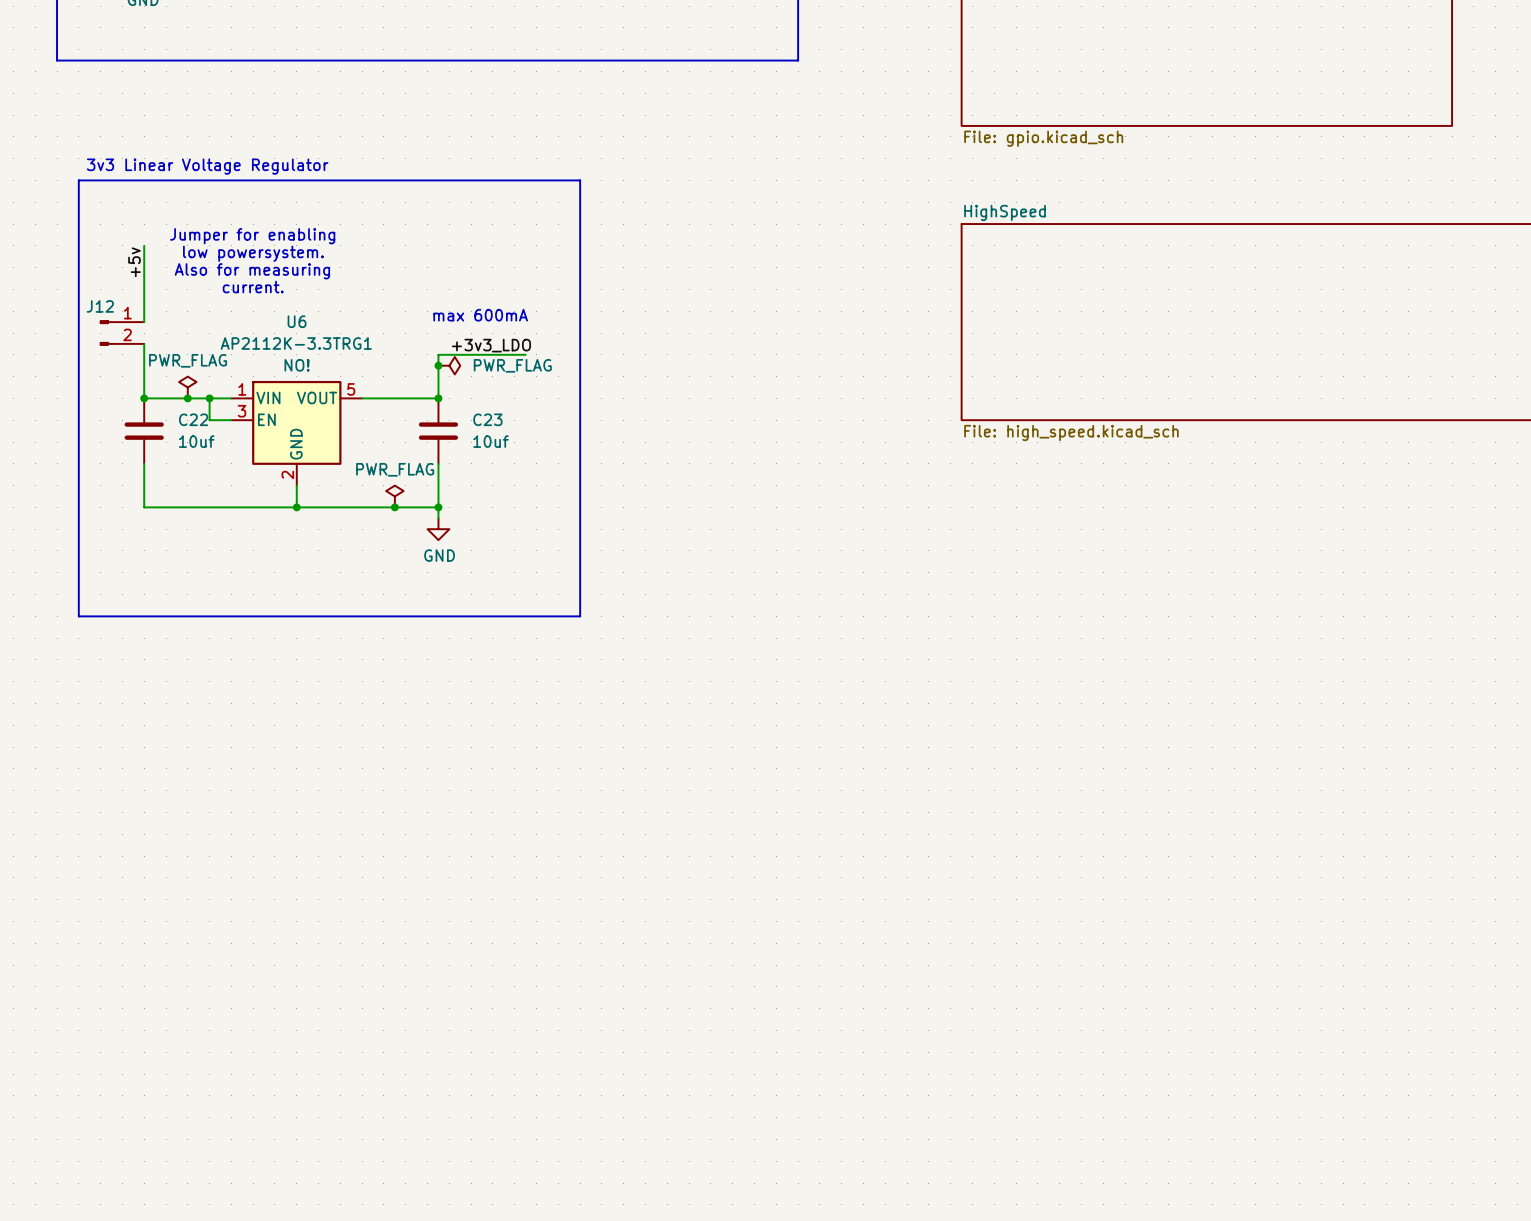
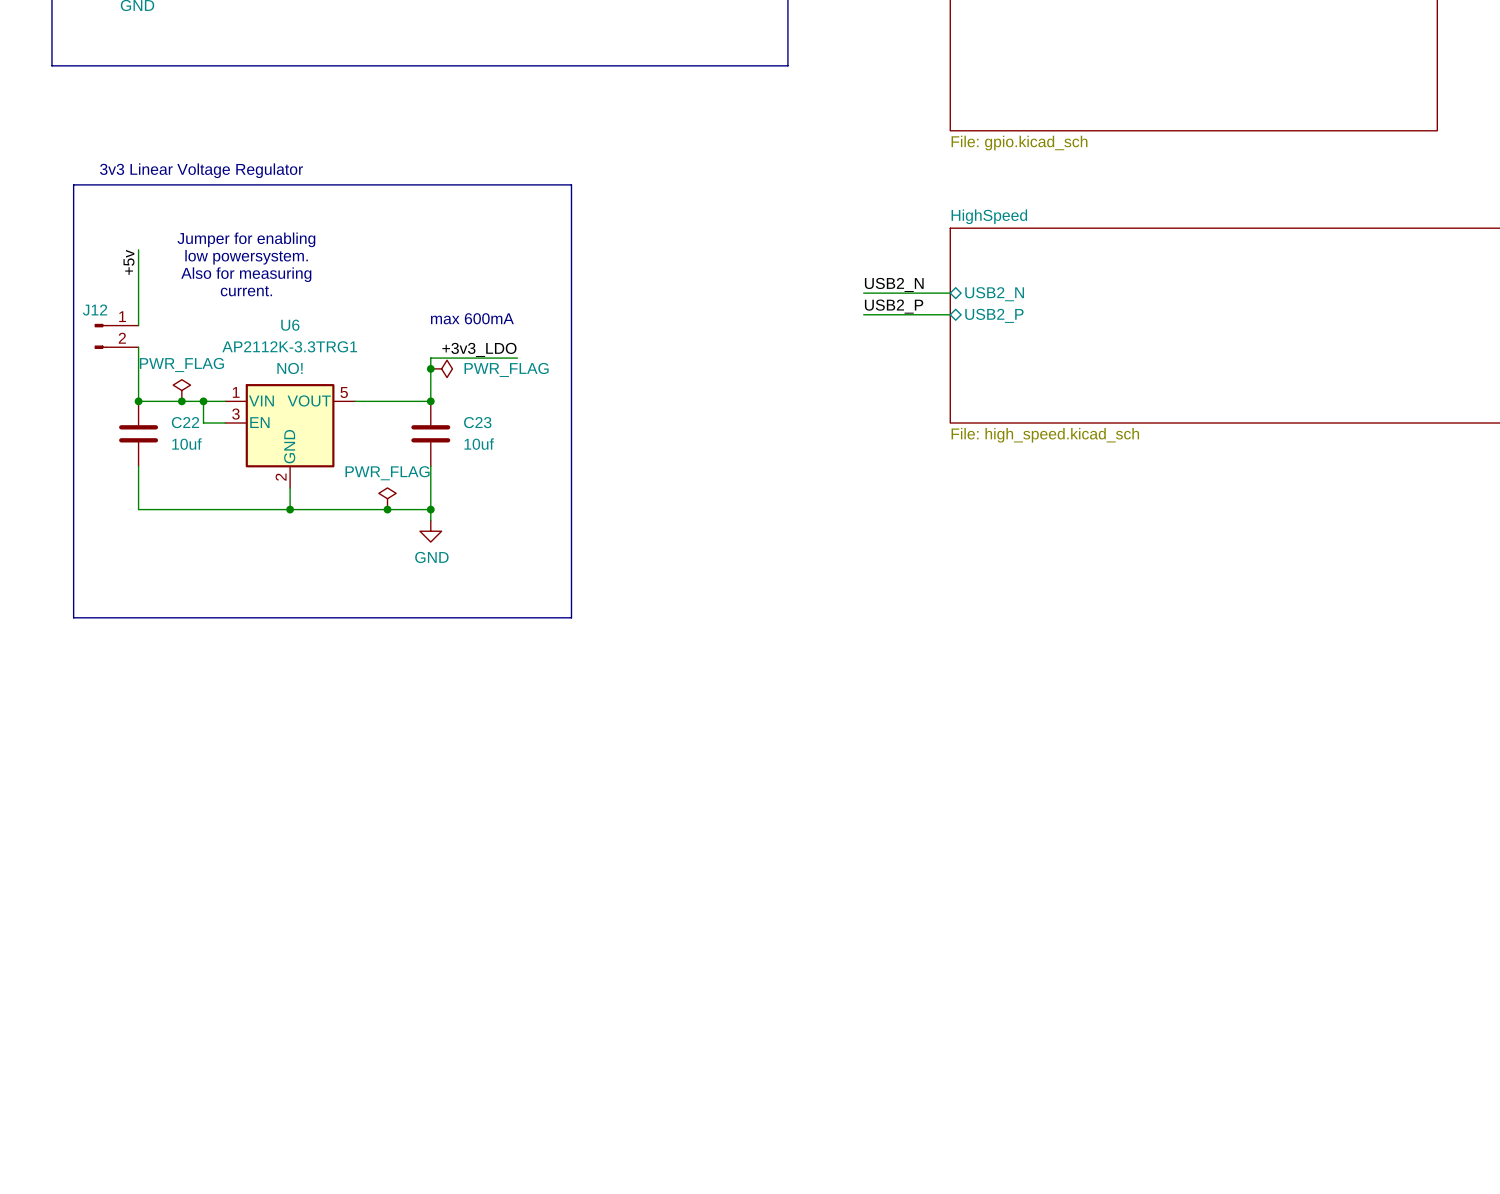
label: none -> USB2_N (894, 284)
wire: none -> (863, 293) (950, 293)
sheet pin: none -> USB2_N (994, 294)
label: none -> USB2_P (894, 306)
wire: none -> (863, 314) (950, 314)
sheet pin: none -> USB2_P (994, 315)

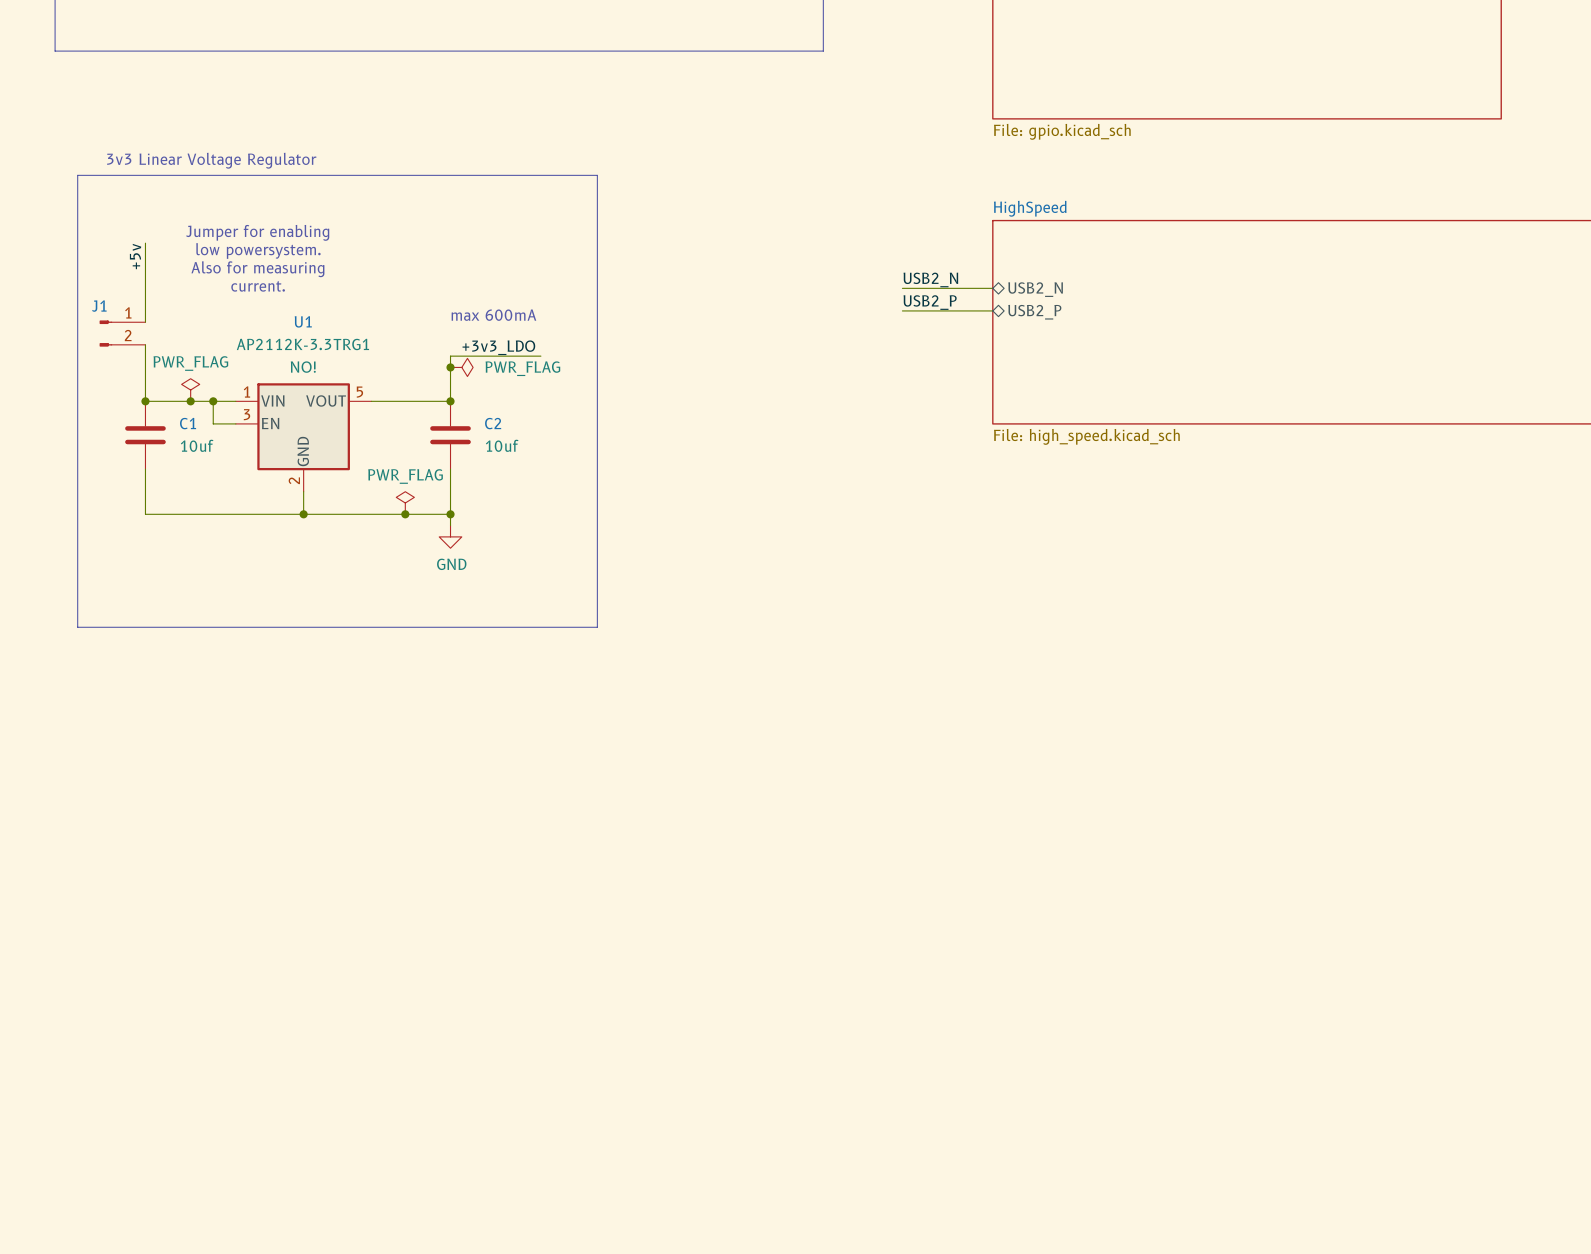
J12 name: J12 (95, 310) -> J1 (99, 306)
U6 name: U6 (290, 325) -> U1 (303, 321)
C22 name: C22 (185, 422) -> C1 (188, 423)
C23 name: C23 (477, 422) -> C2 (493, 423)

